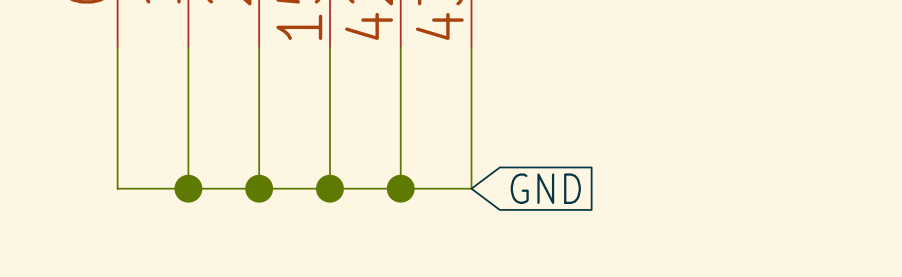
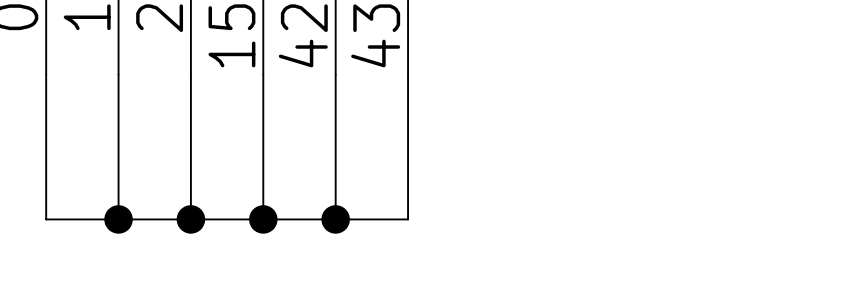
global label: GND (545, 188) -> none

